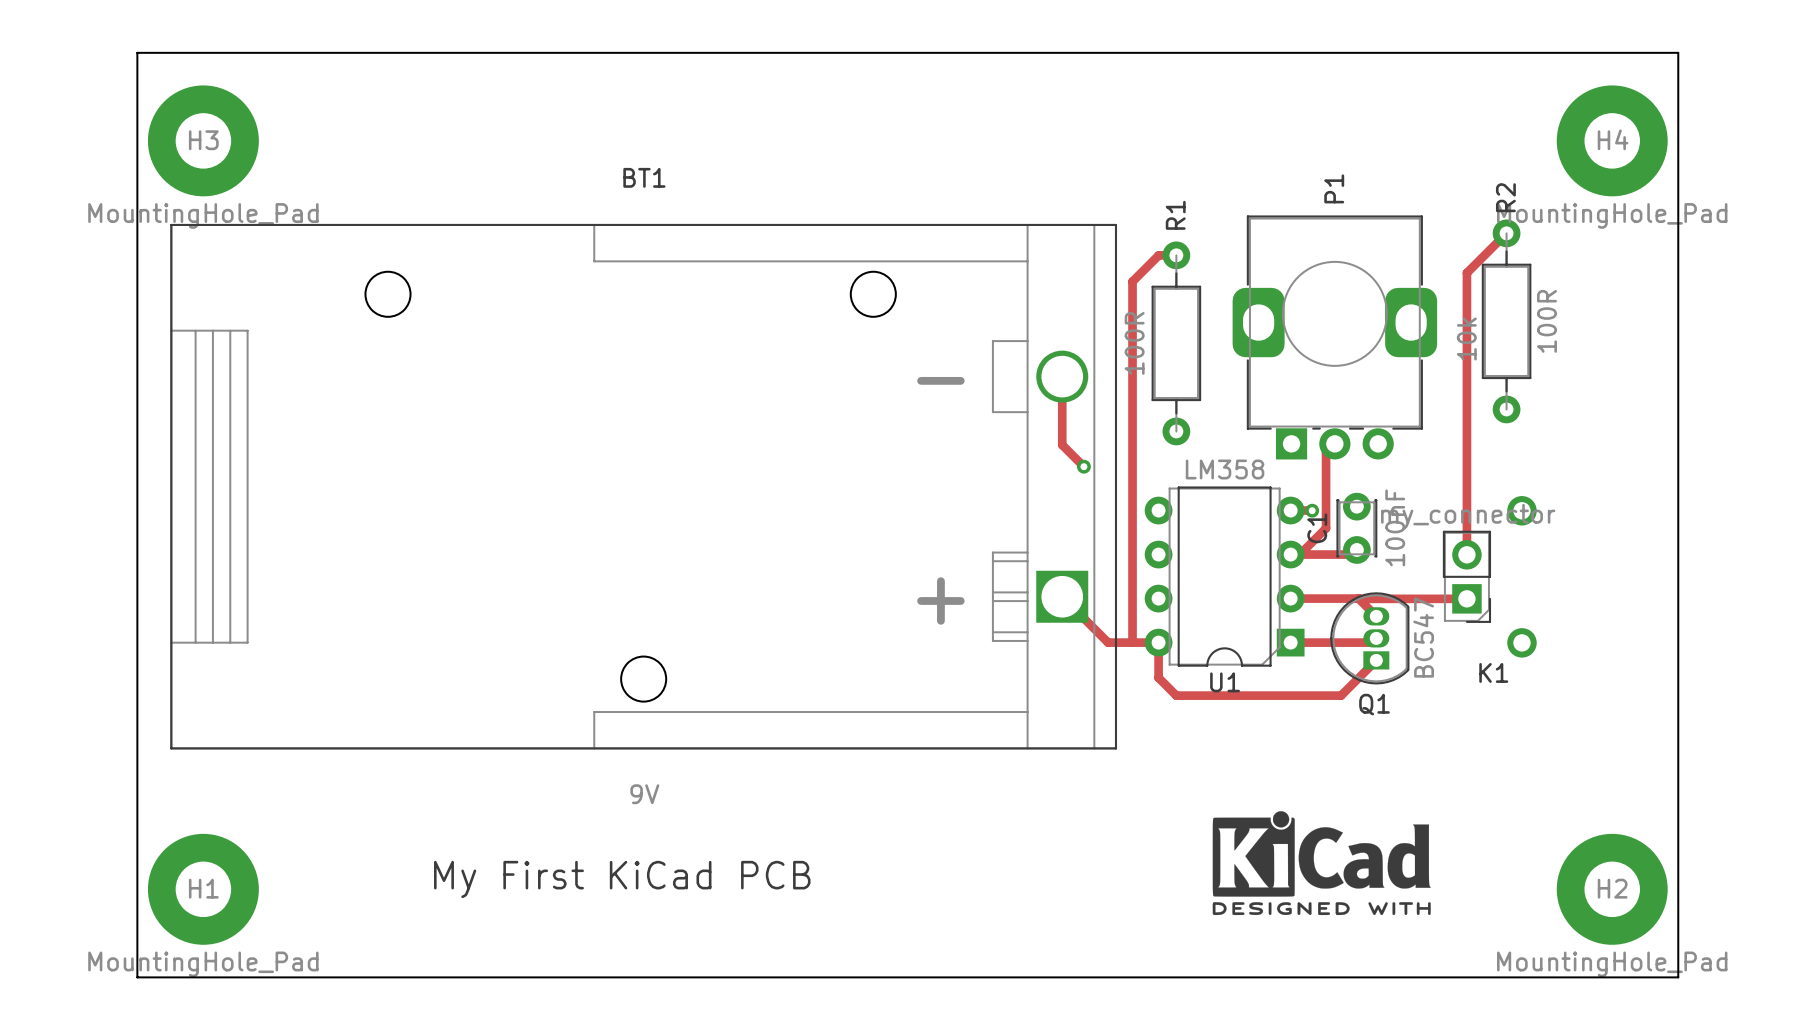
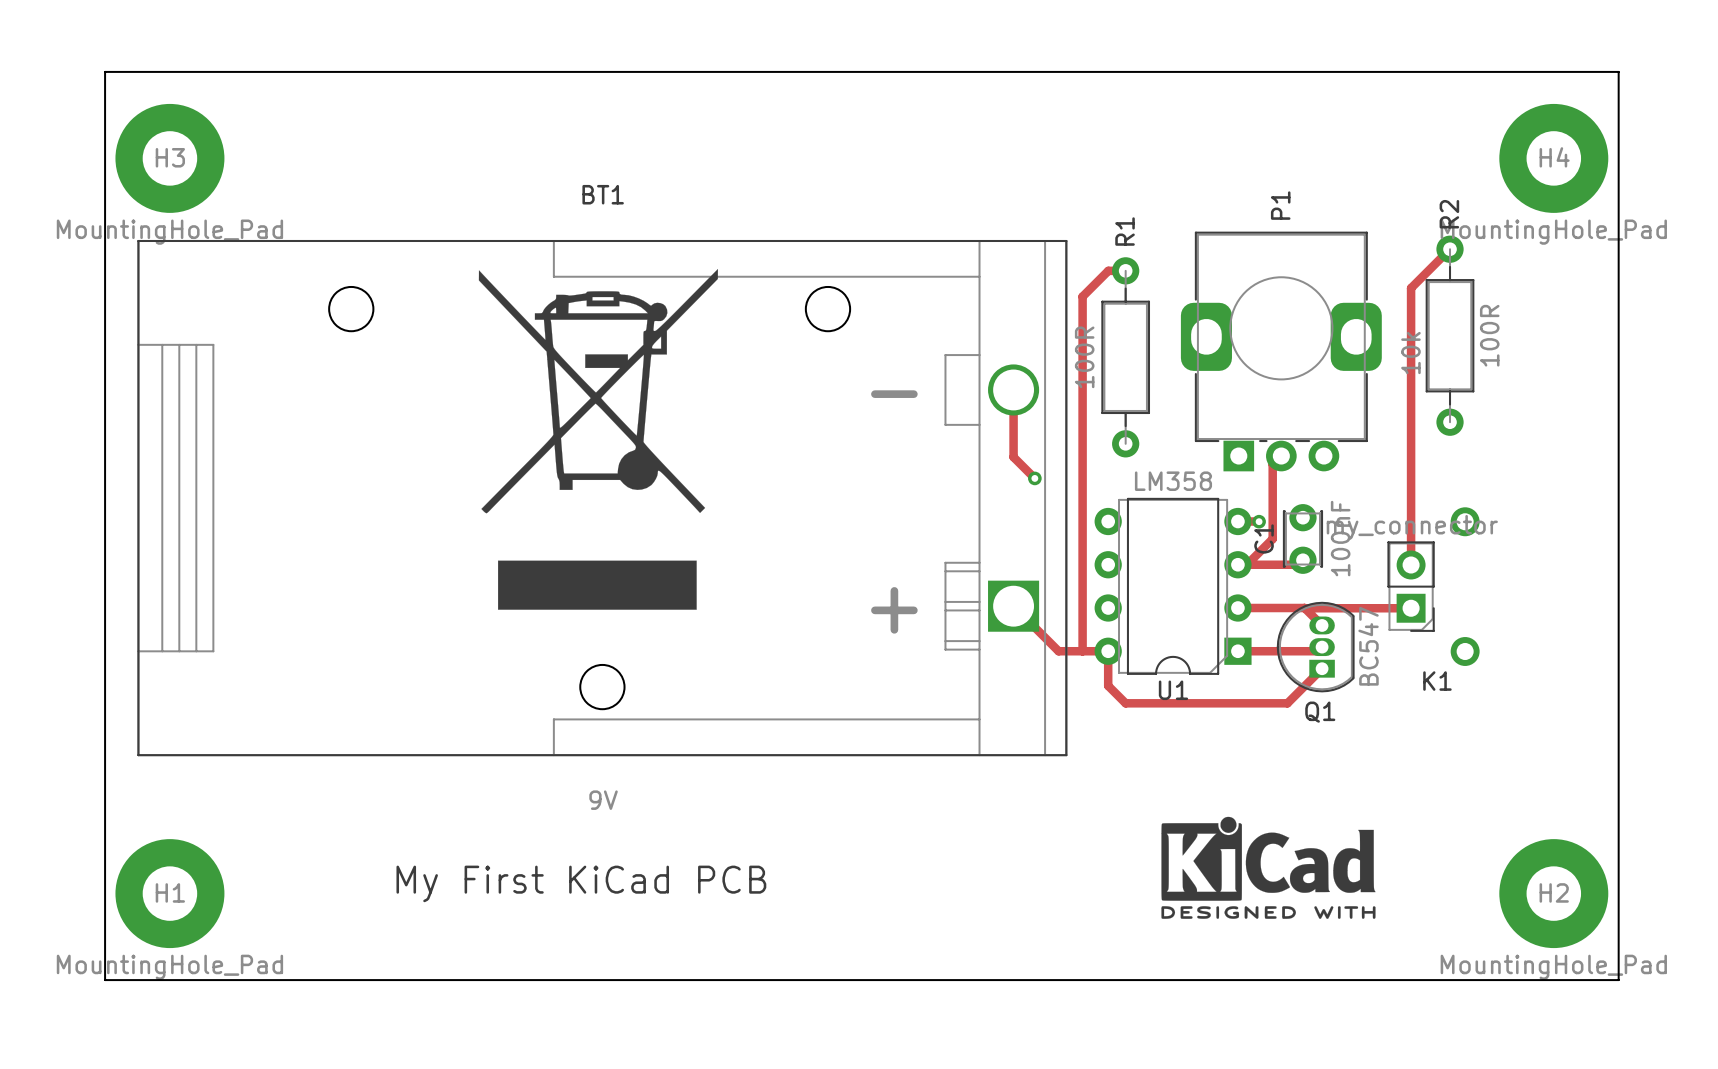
drawing: none -> [478, 269, 718, 610]

